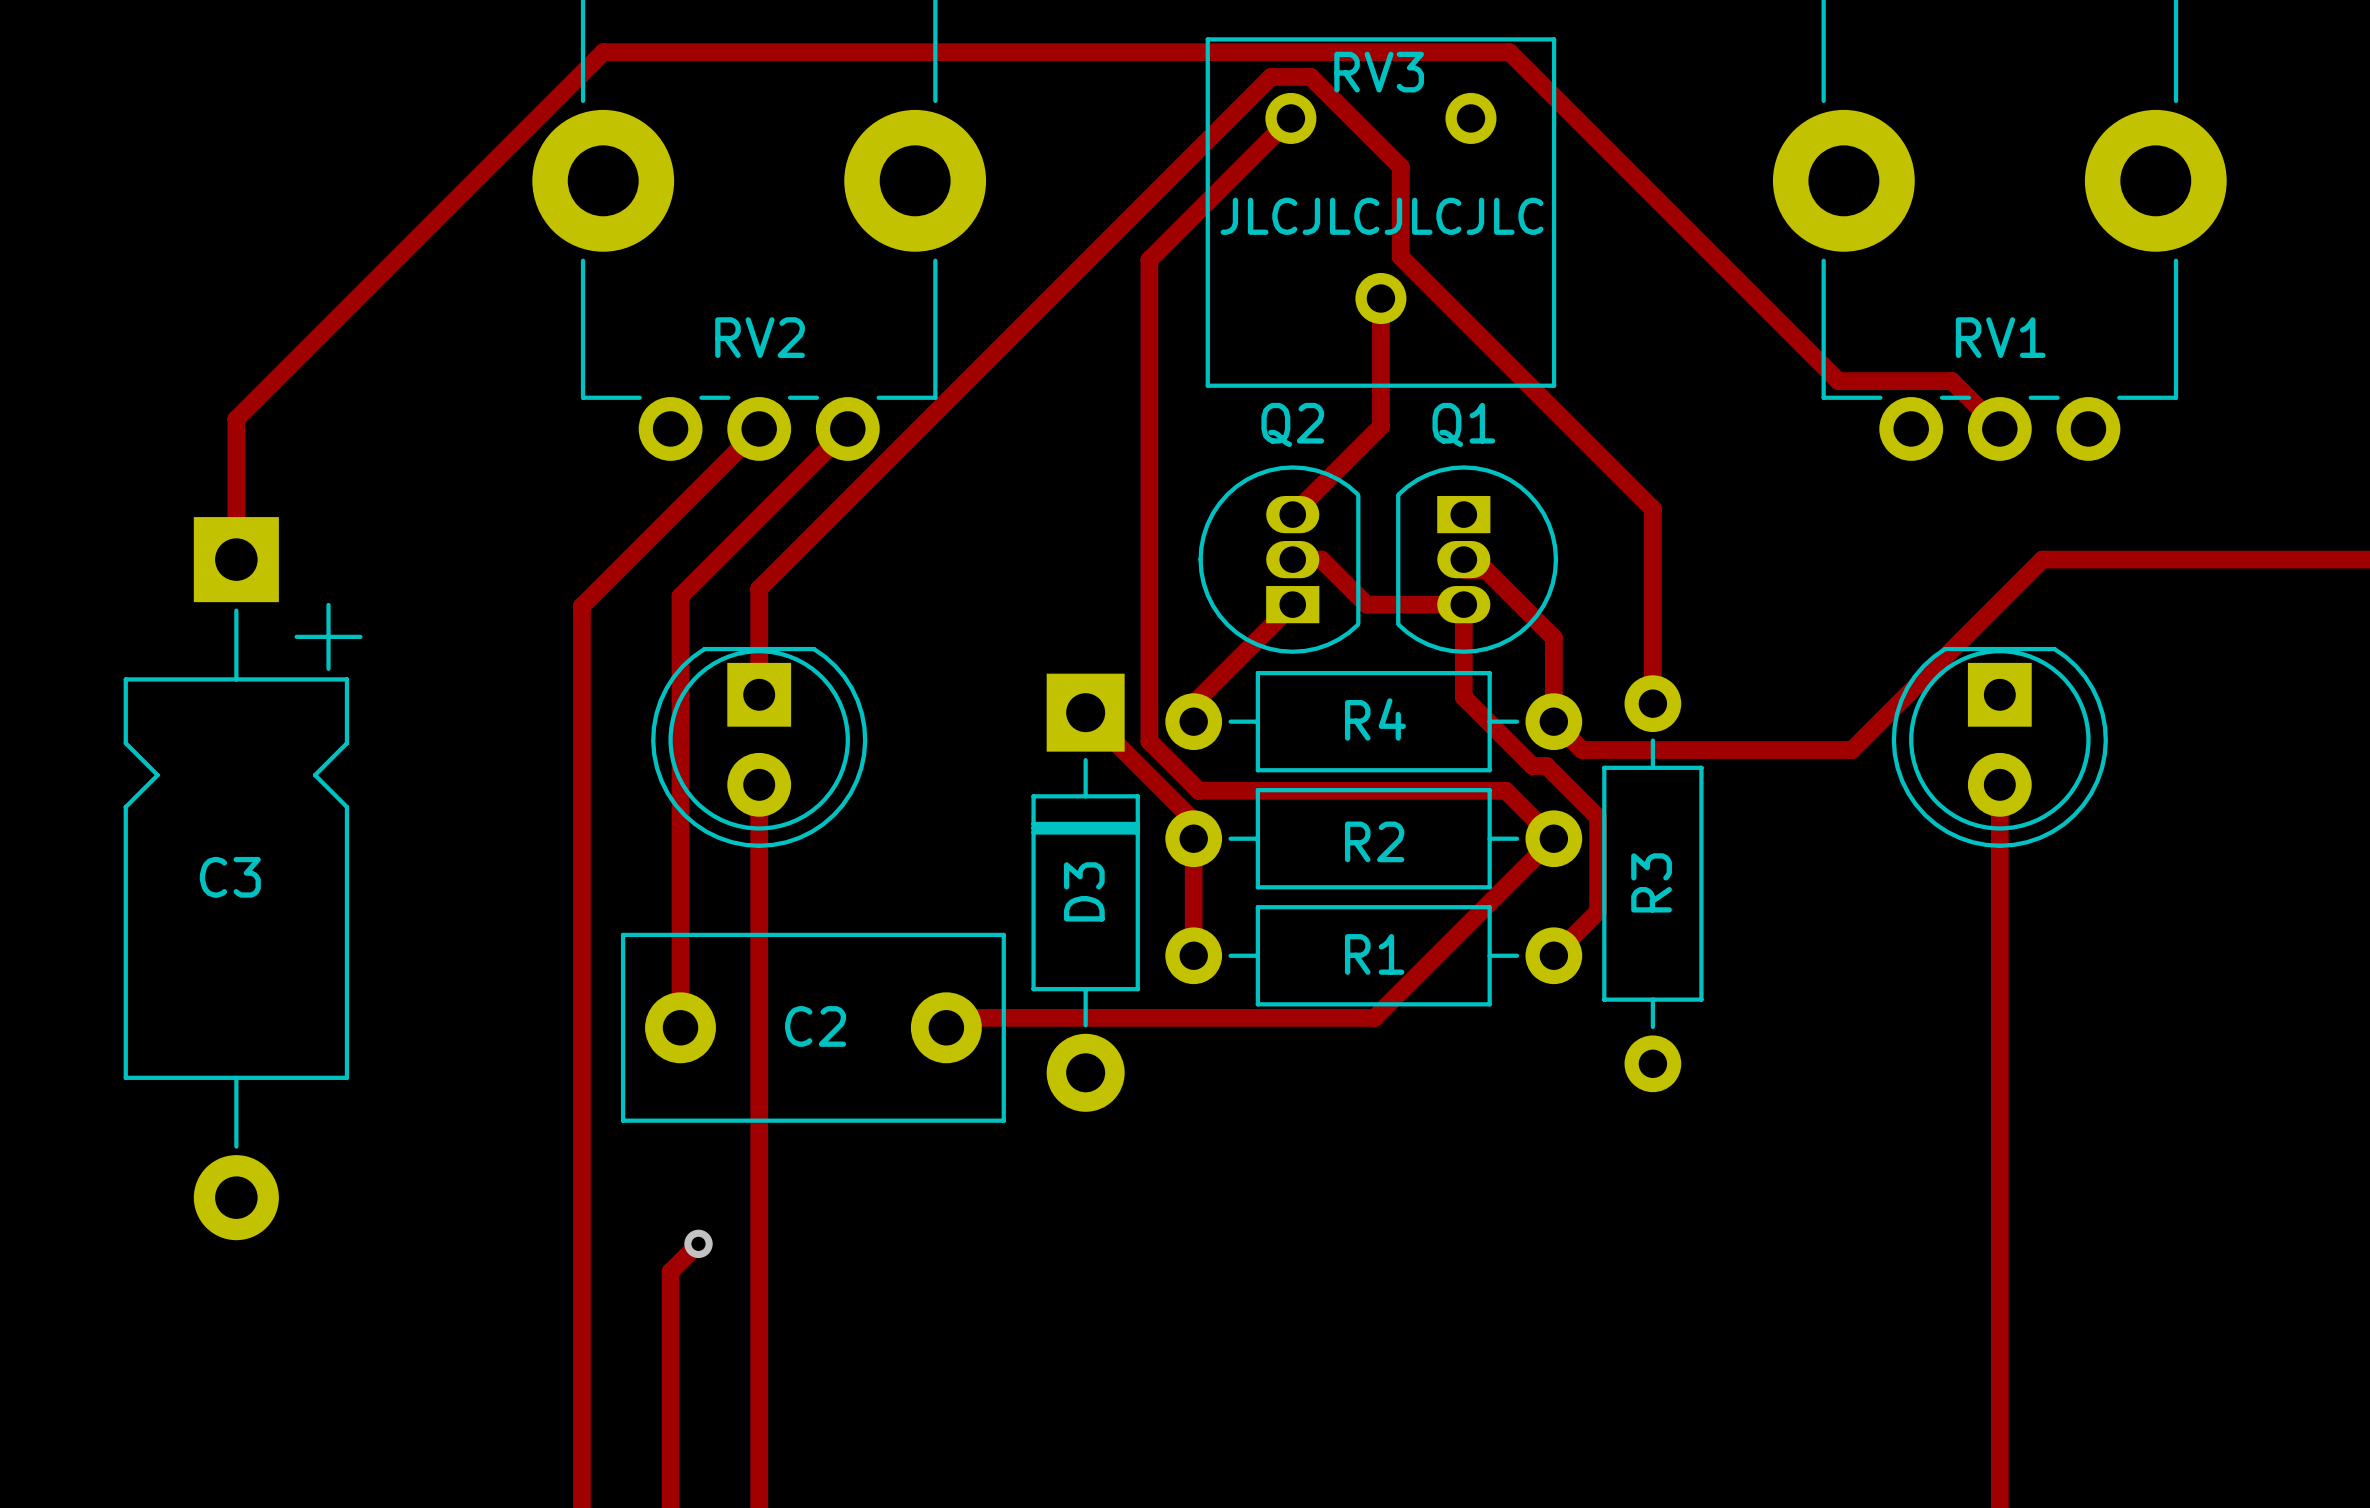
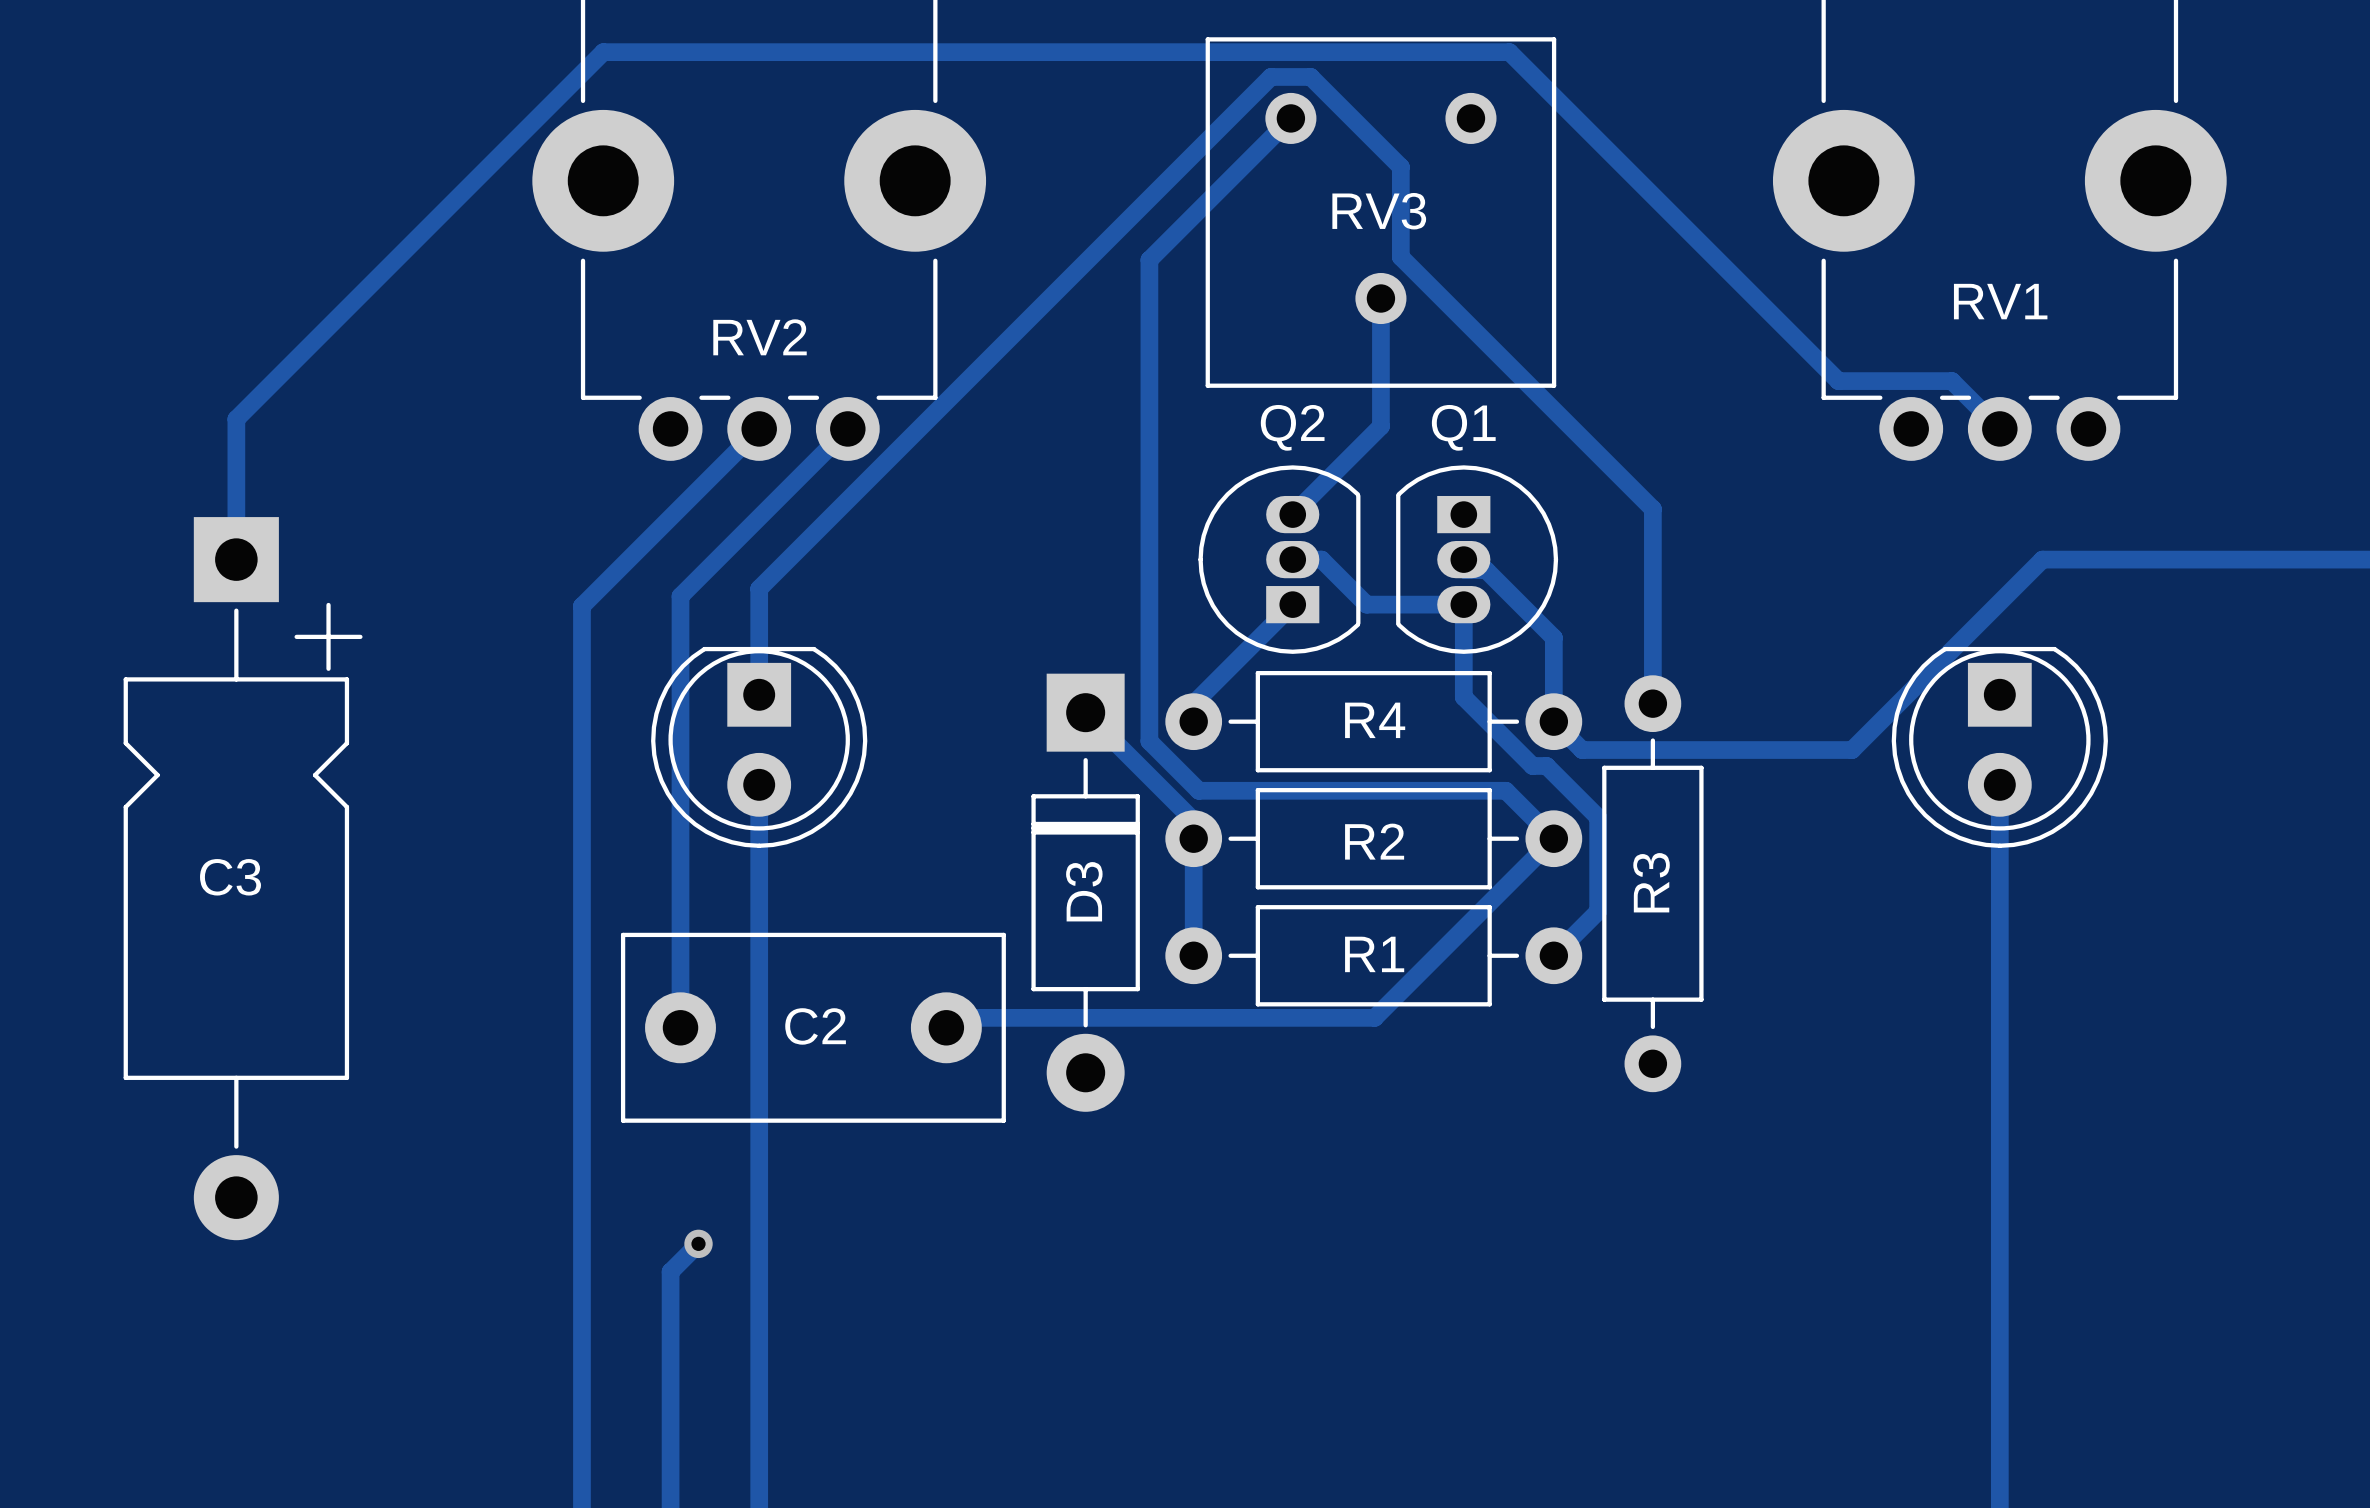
RV3 name position: RV3 (1379, 72) -> RV3 (1379, 211)
text: JLCJLCJLCJLC (1382, 216) -> none
RV1 name position: RV1 (2000, 337) -> RV1 (2000, 301)

